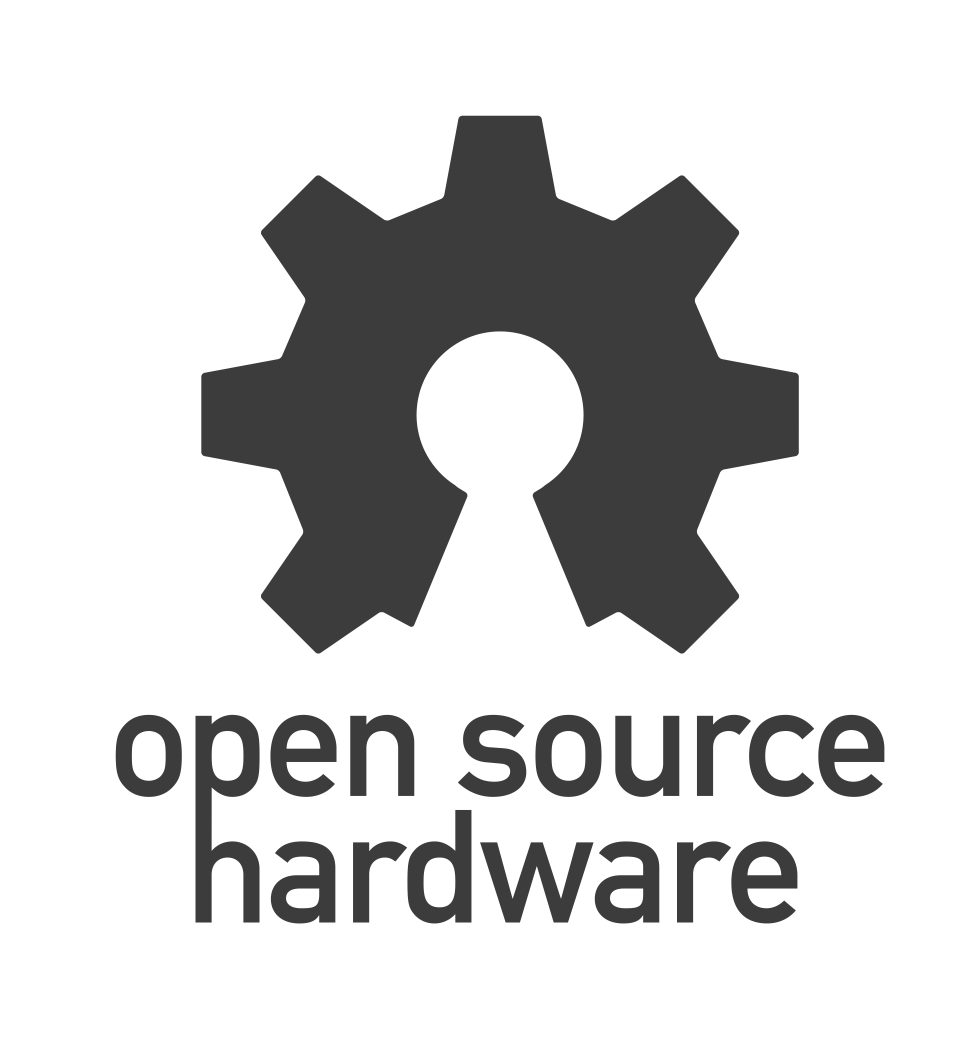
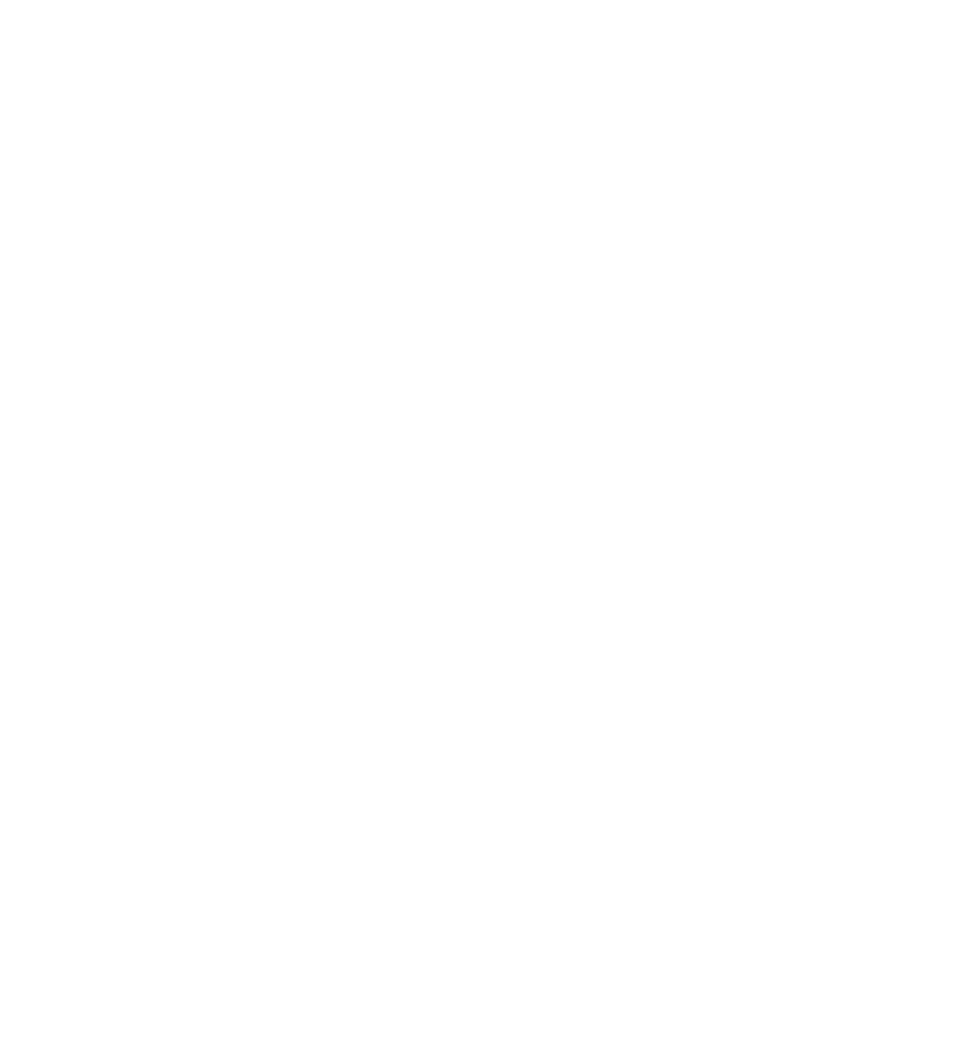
drawing: [201, 115, 799, 654] -> none
drawing: [115, 714, 885, 924] -> none

